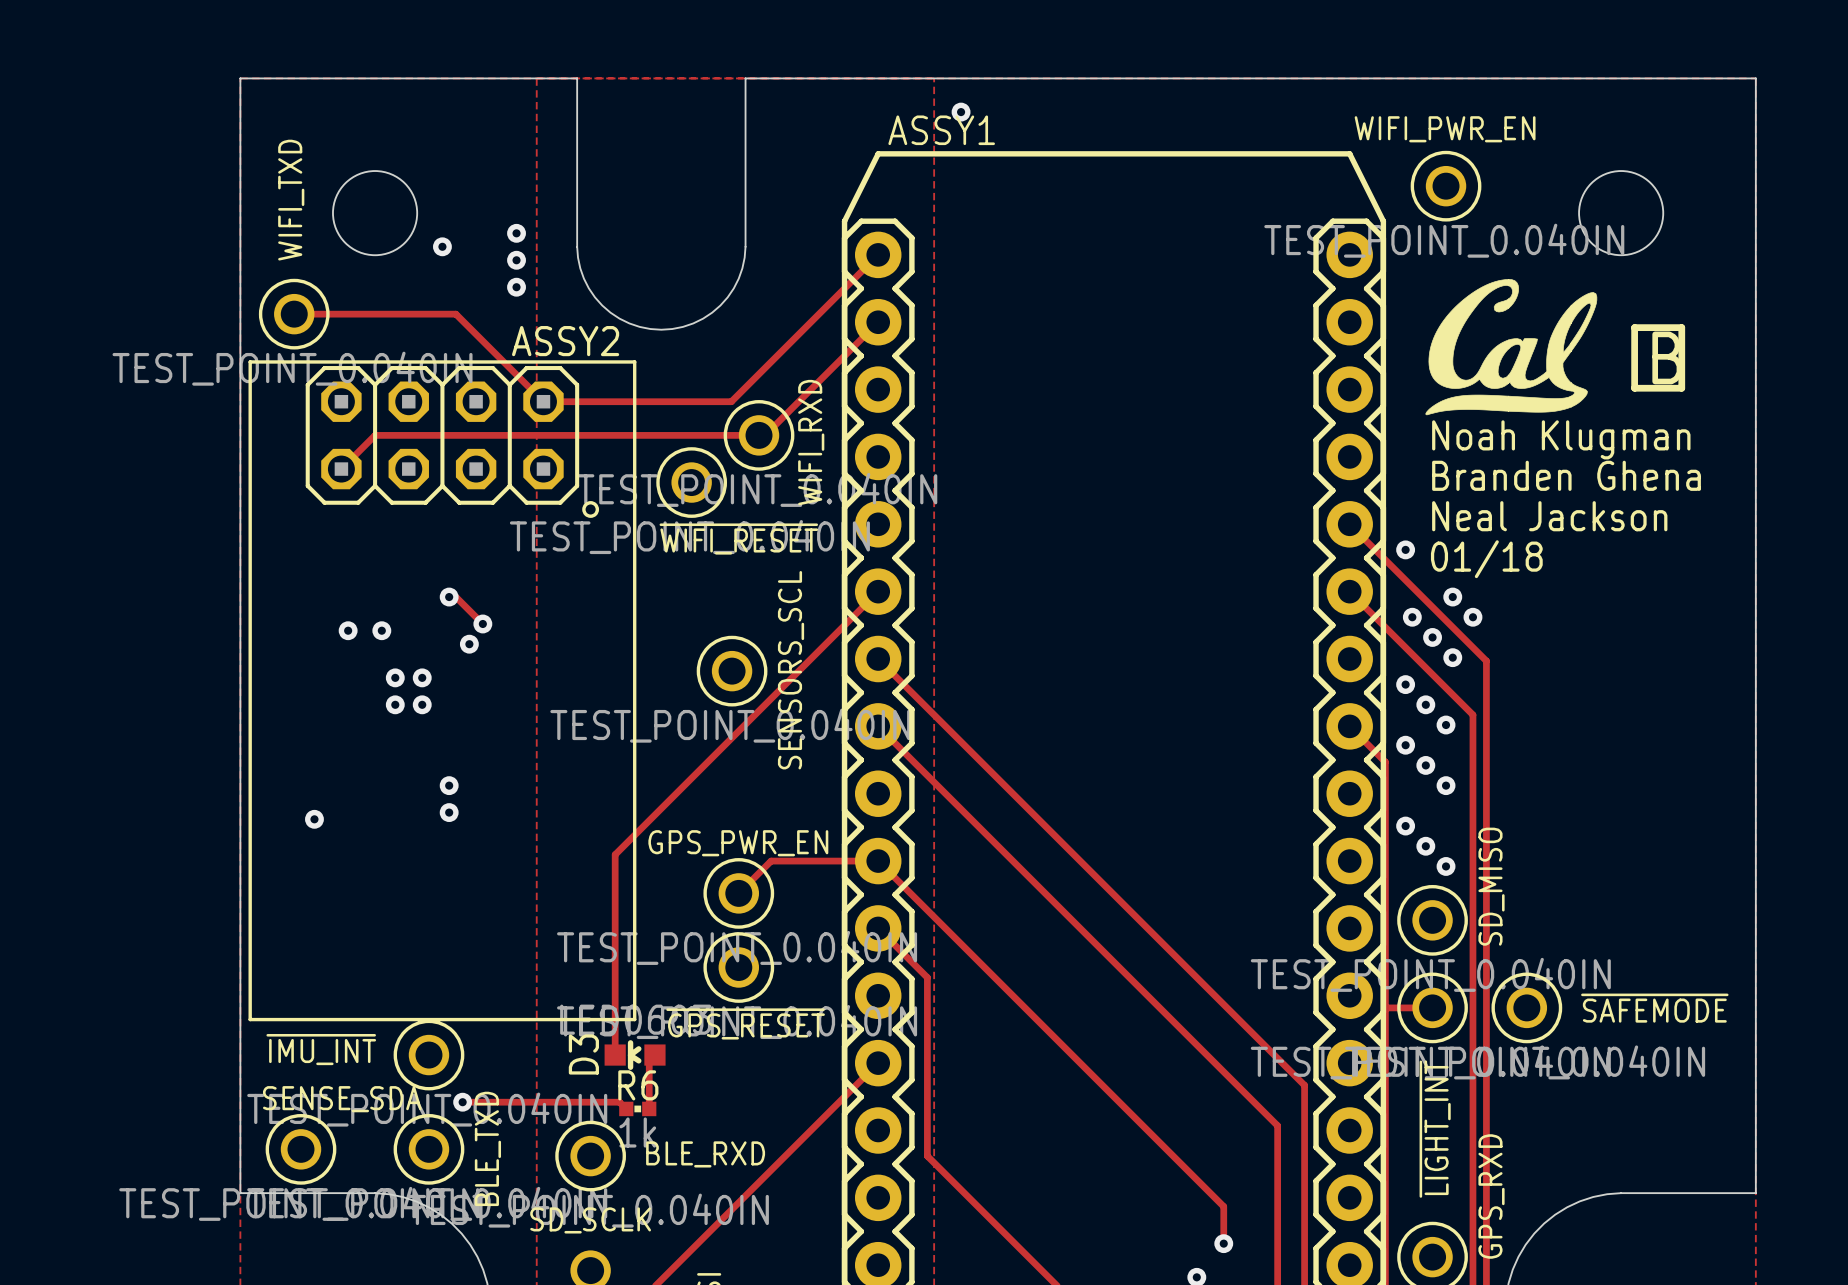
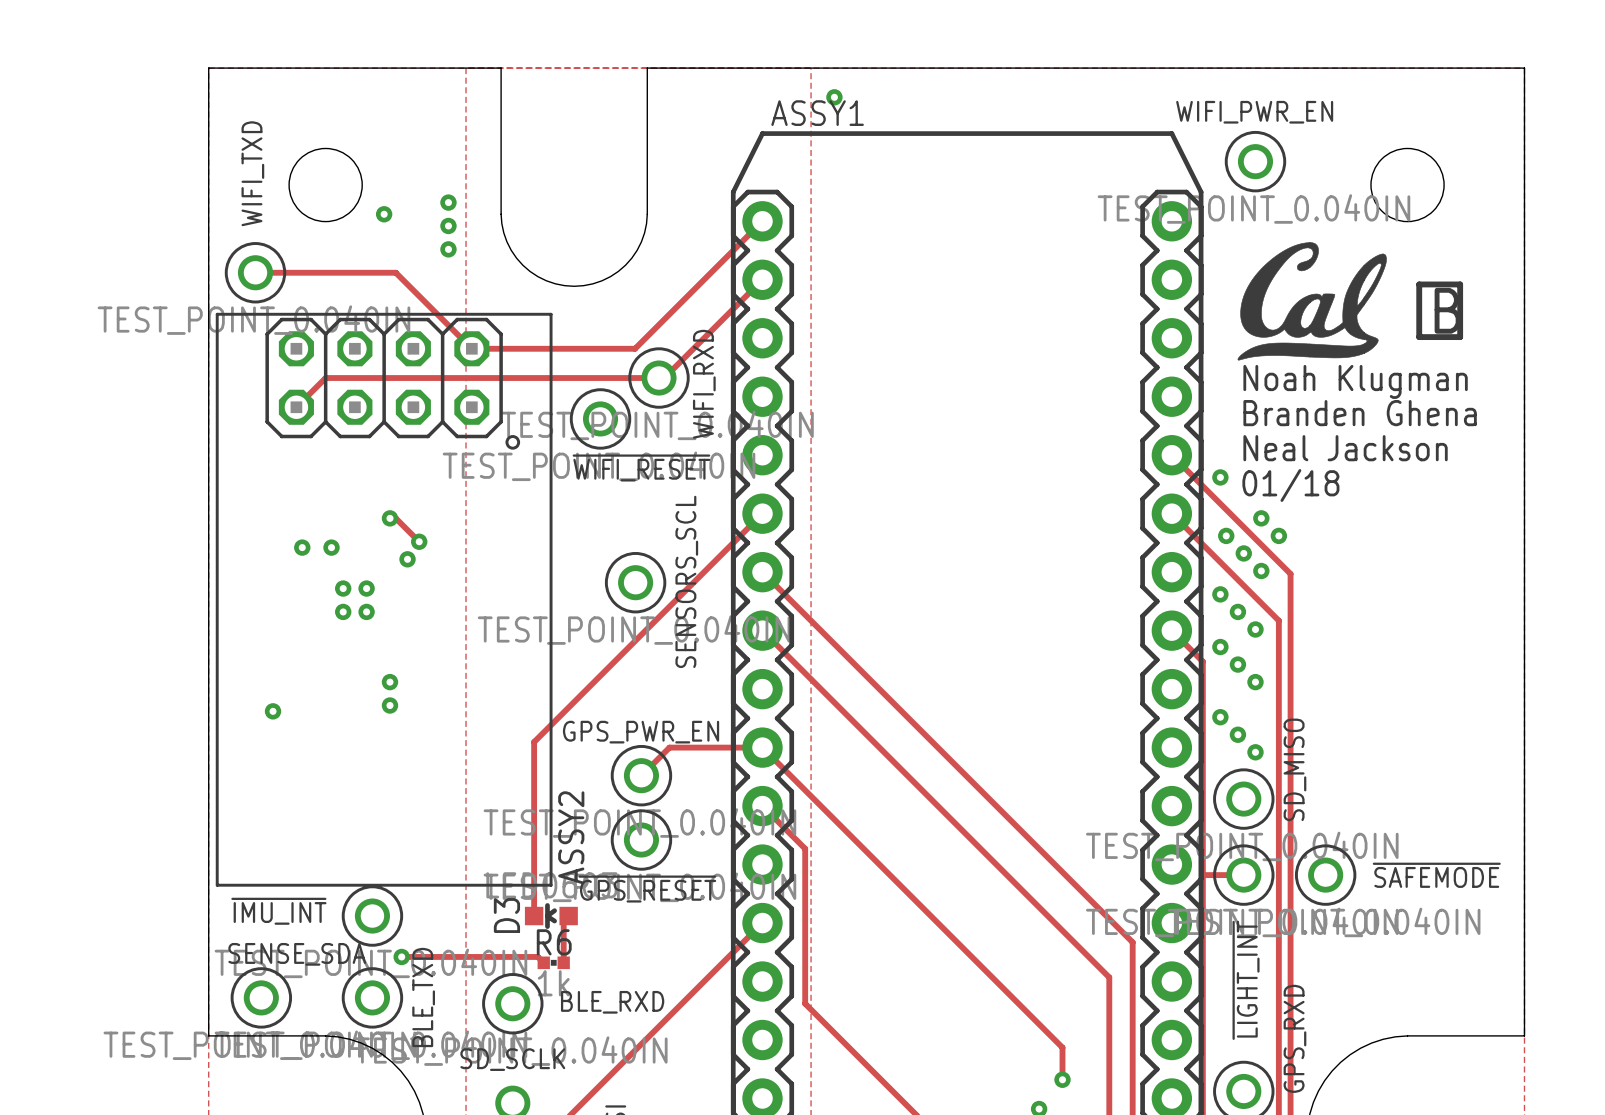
ASSY2 name rotation: 0° (565, 341) -> 90° counterclockwise (571, 837)
ASSY2 name position: ASSY2 (565, 341) -> ASSY2 (571, 837)

